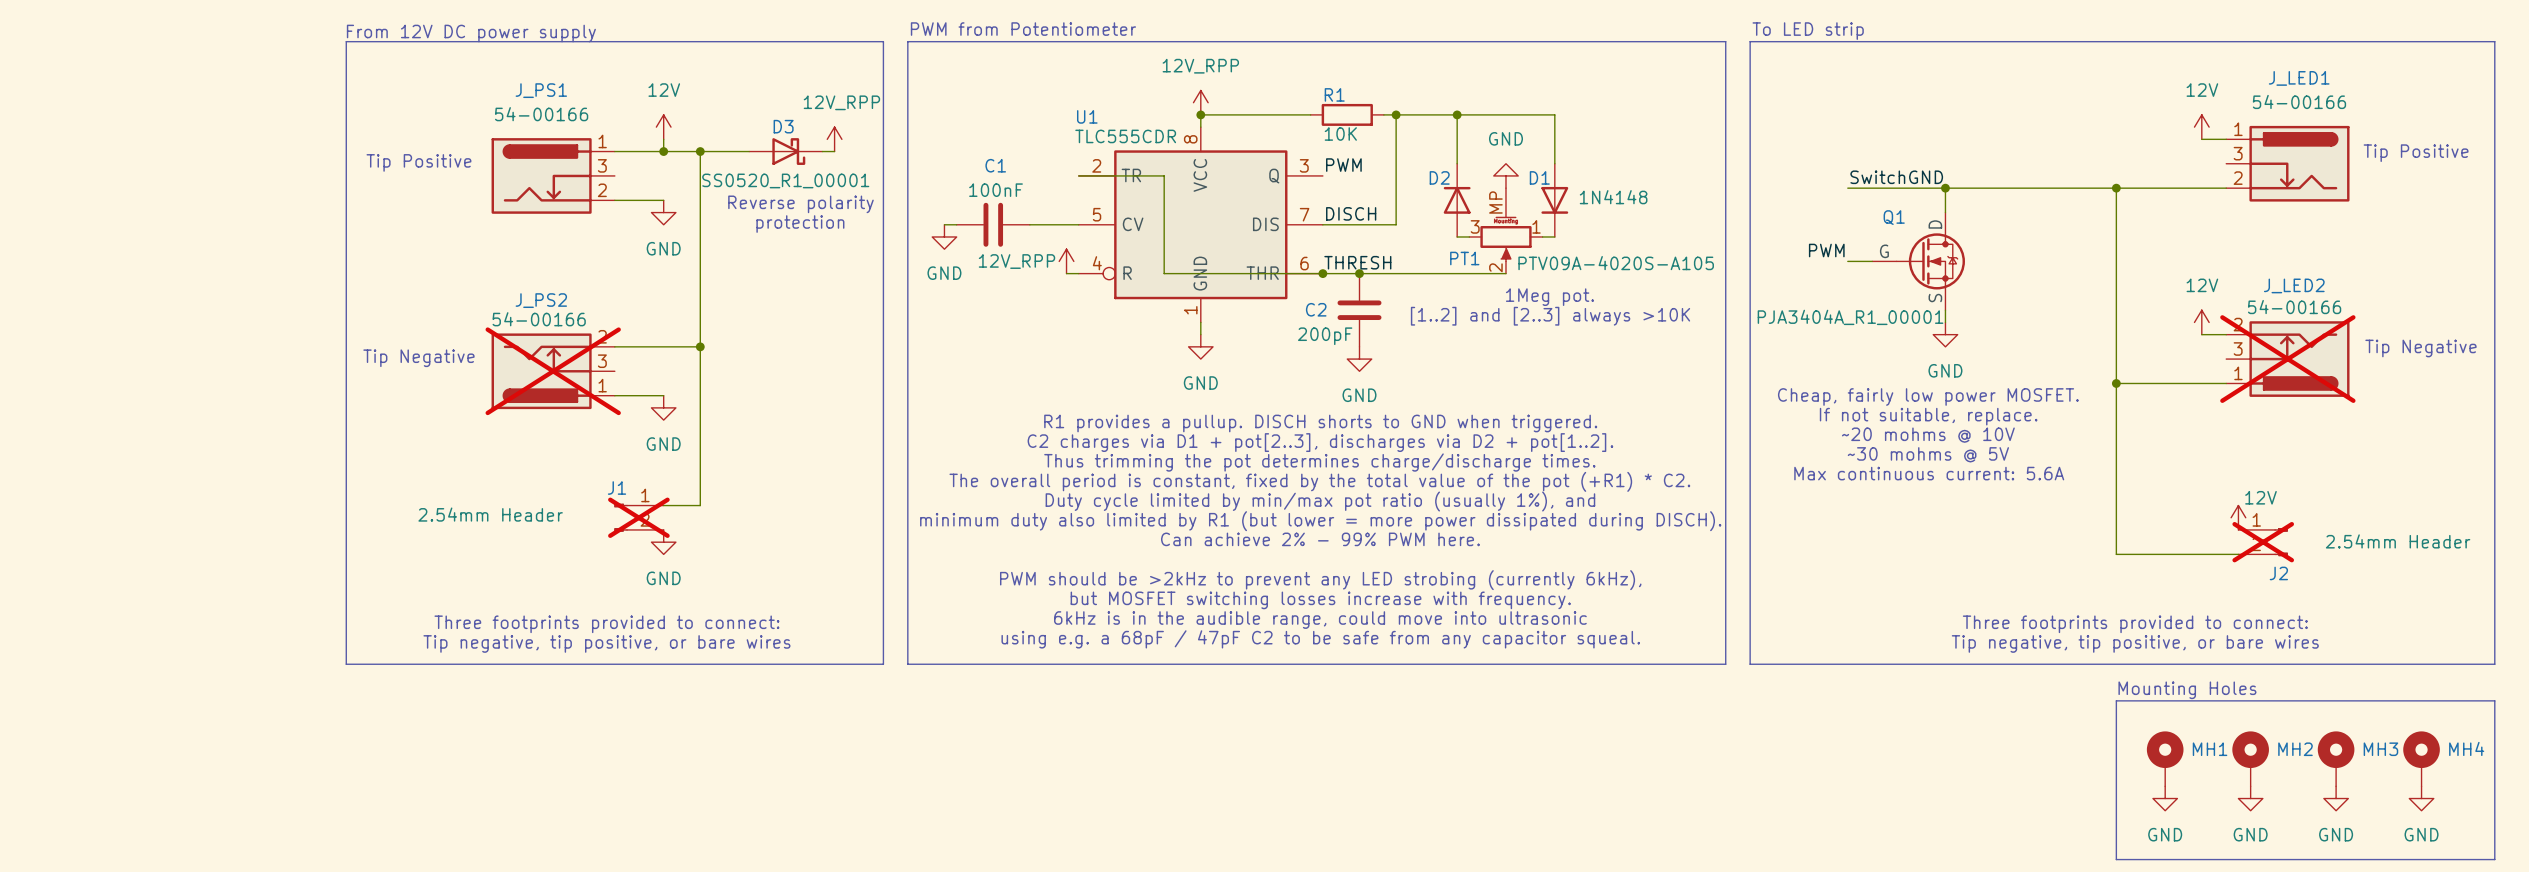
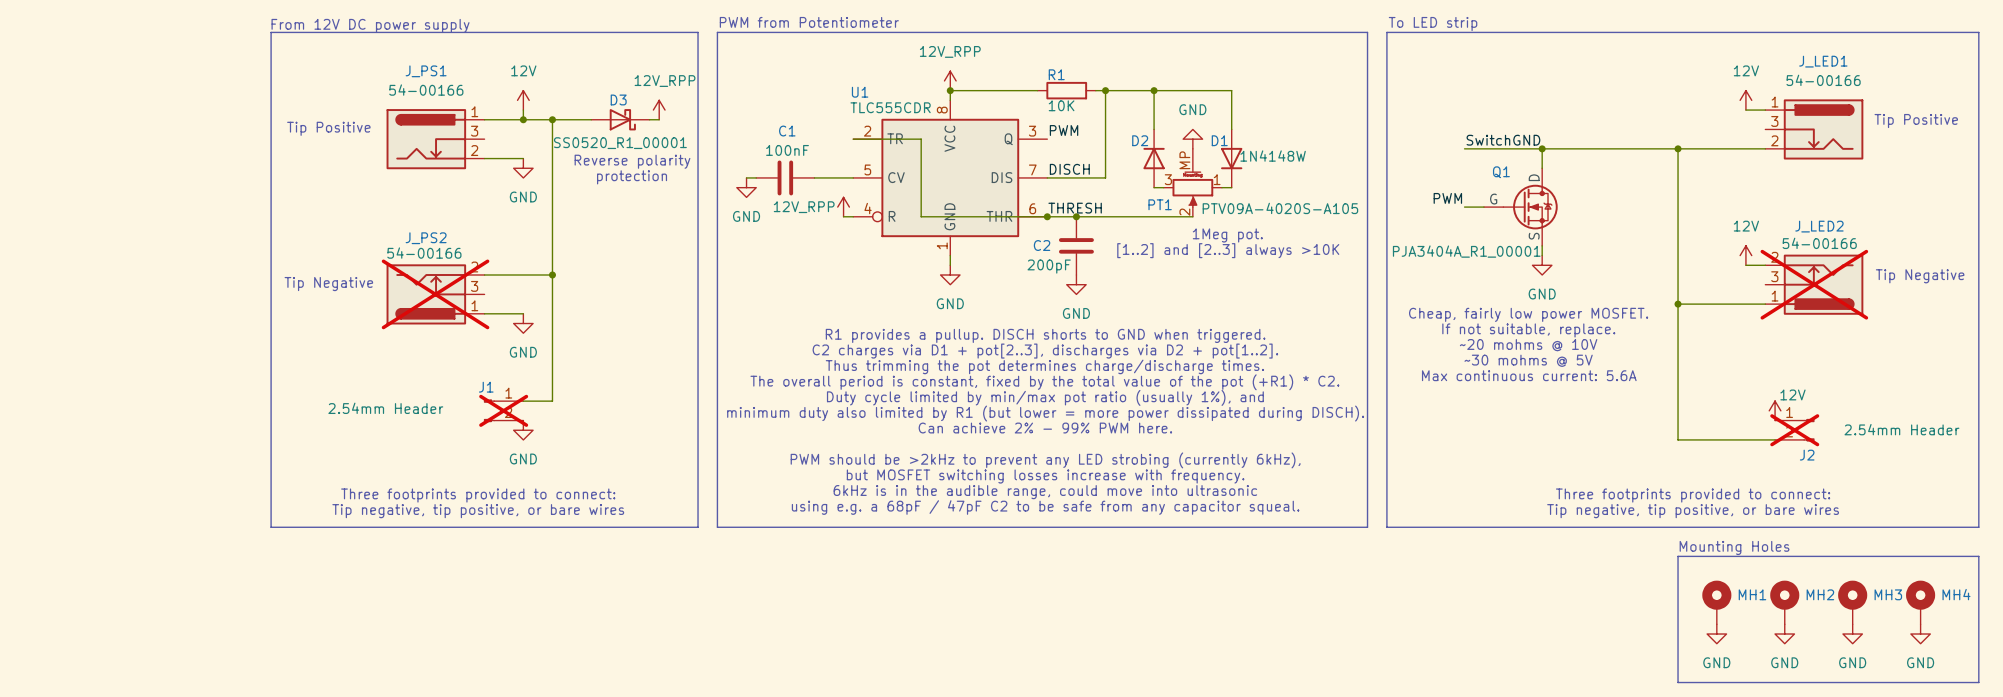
D1 value: 1N4148 (1613, 197) -> 1N4148W (1273, 156)

